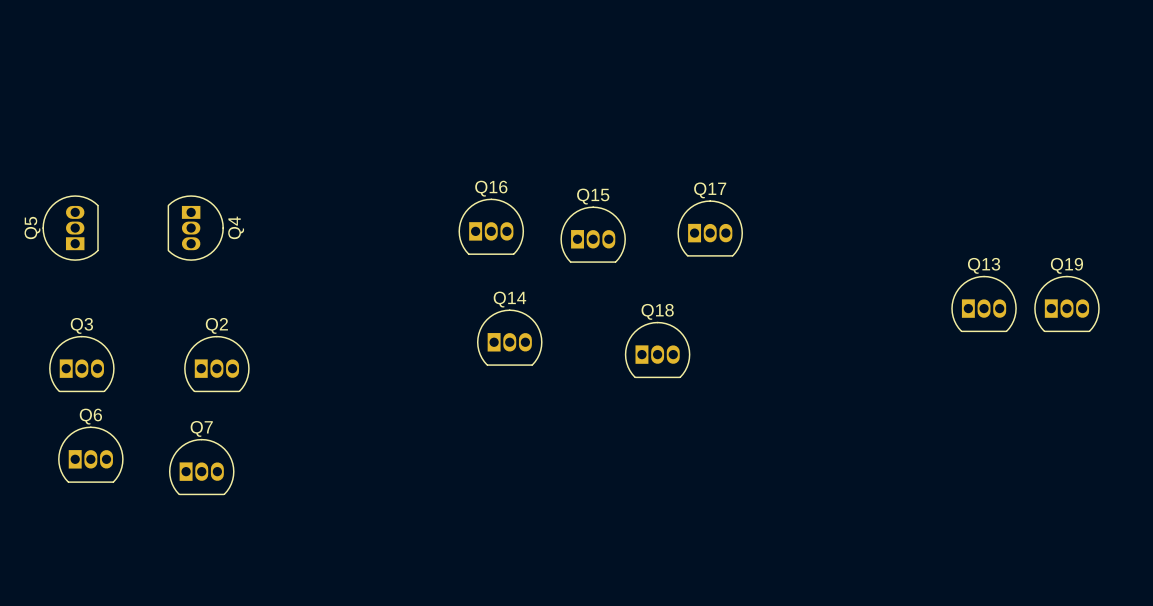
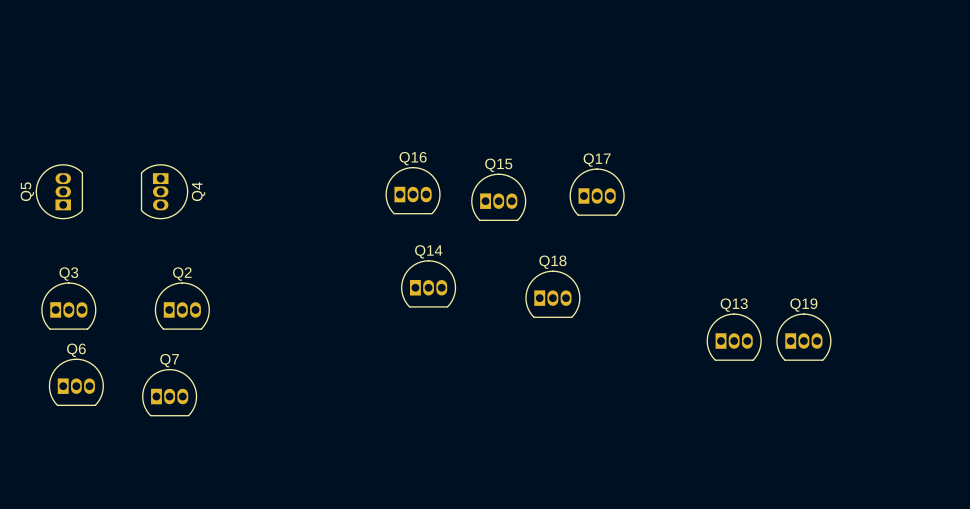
Q13 position: (984, 303) -> (734, 337)
Q19 position: (1066, 303) -> (803, 337)

